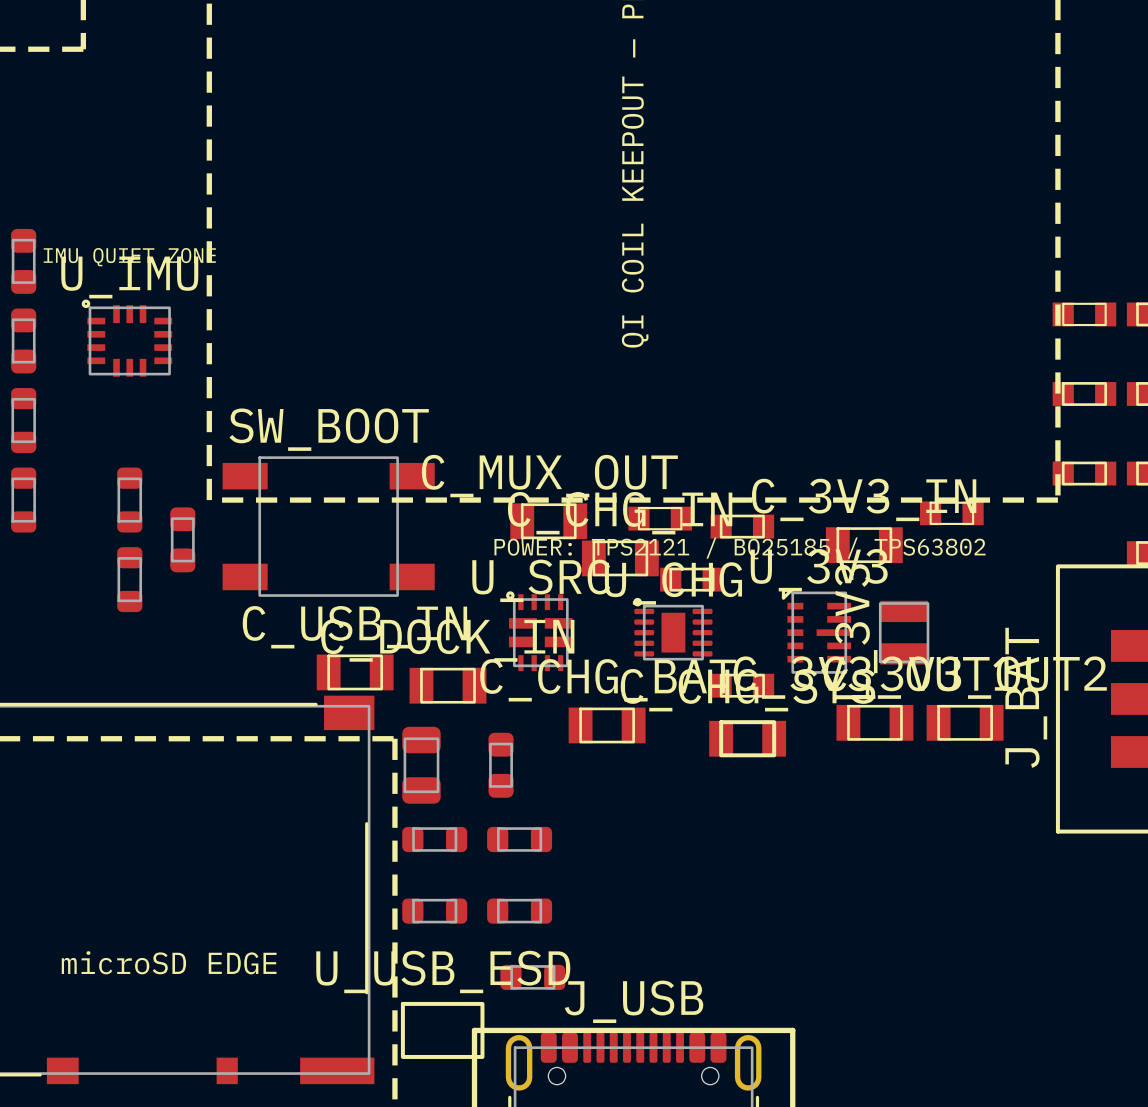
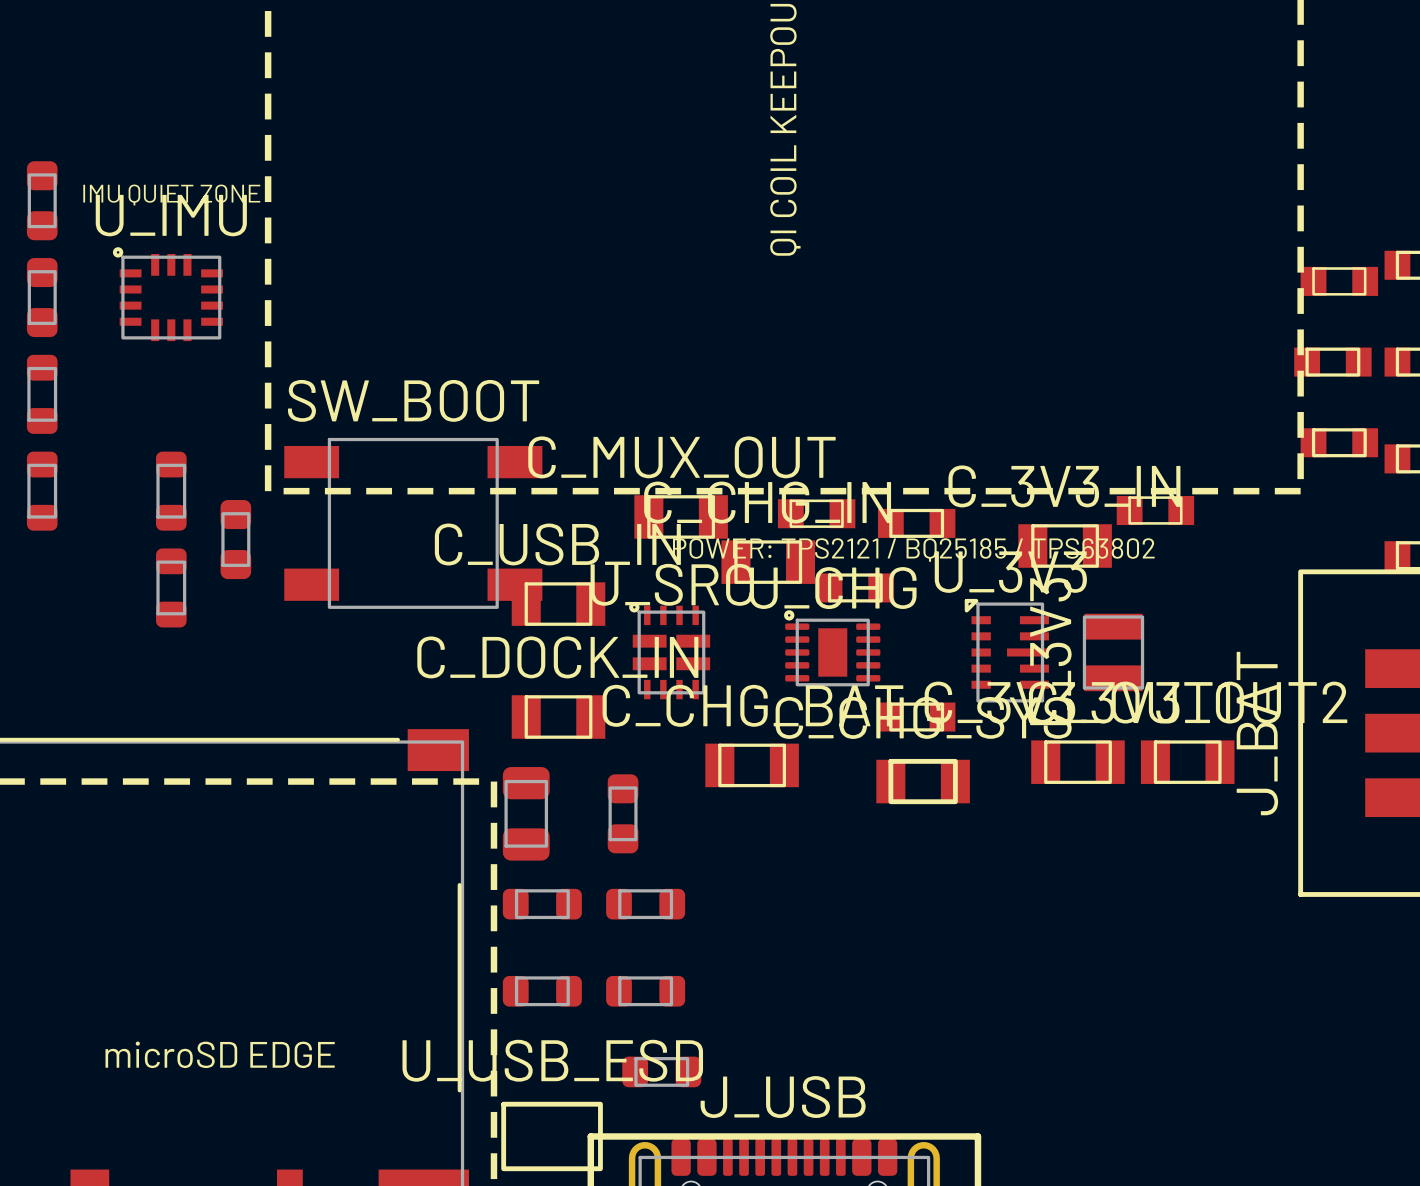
part position: (1084, 314) -> (1339, 281)
part position: (1084, 473) -> (1339, 442)
part position: (951, 513) -> (1155, 510)
C_USB_IN position: (355, 672) -> (558, 604)

